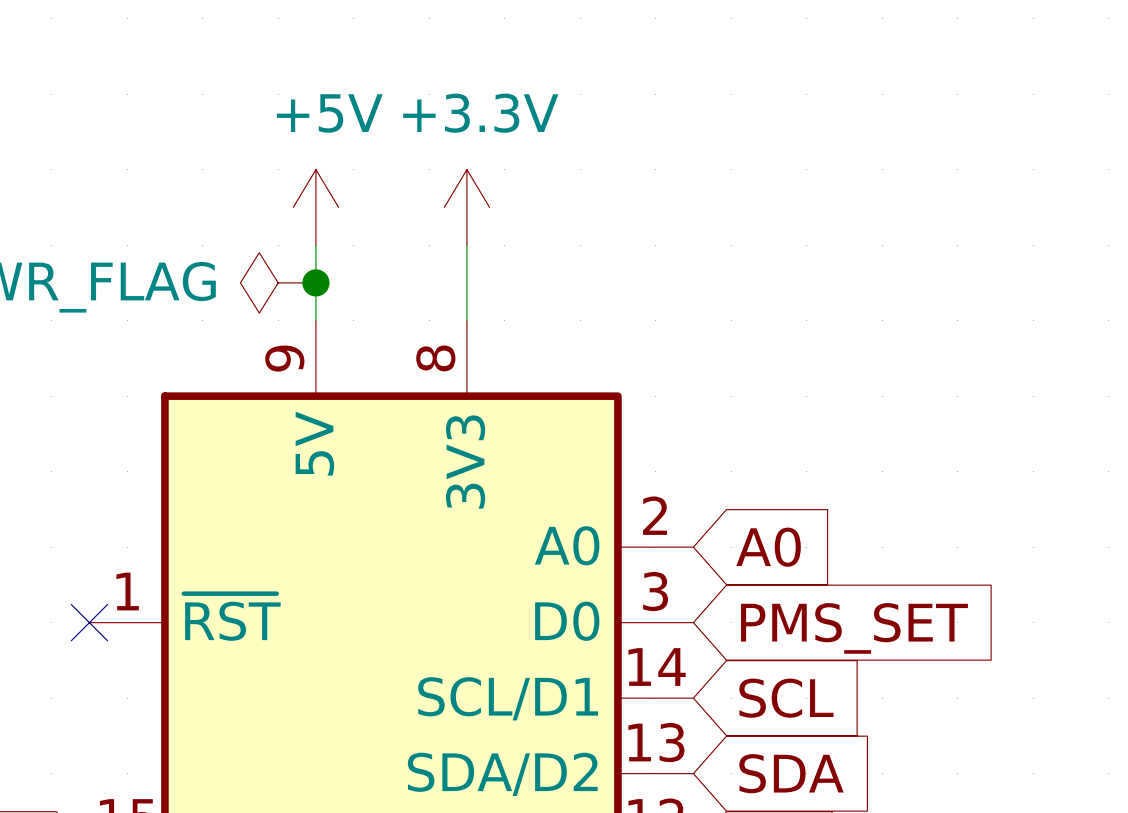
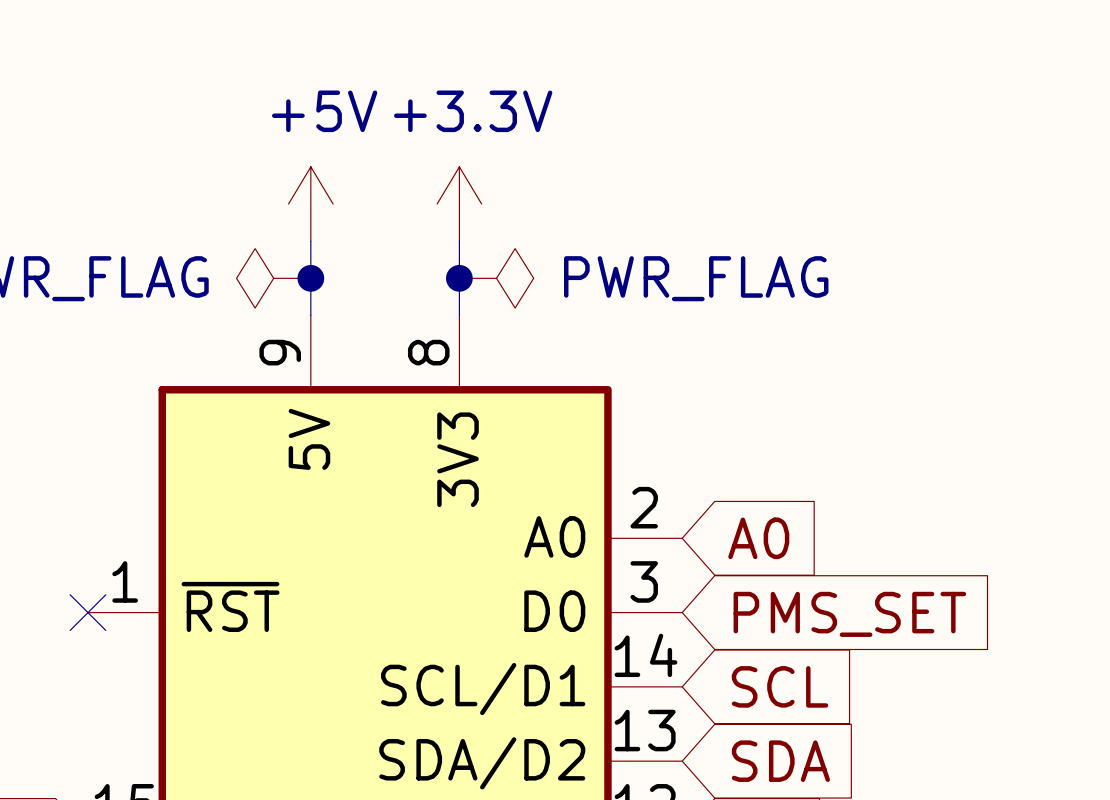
junction: none -> (459, 278)
power symbol: none -> PWR_FLAG (496, 278)

